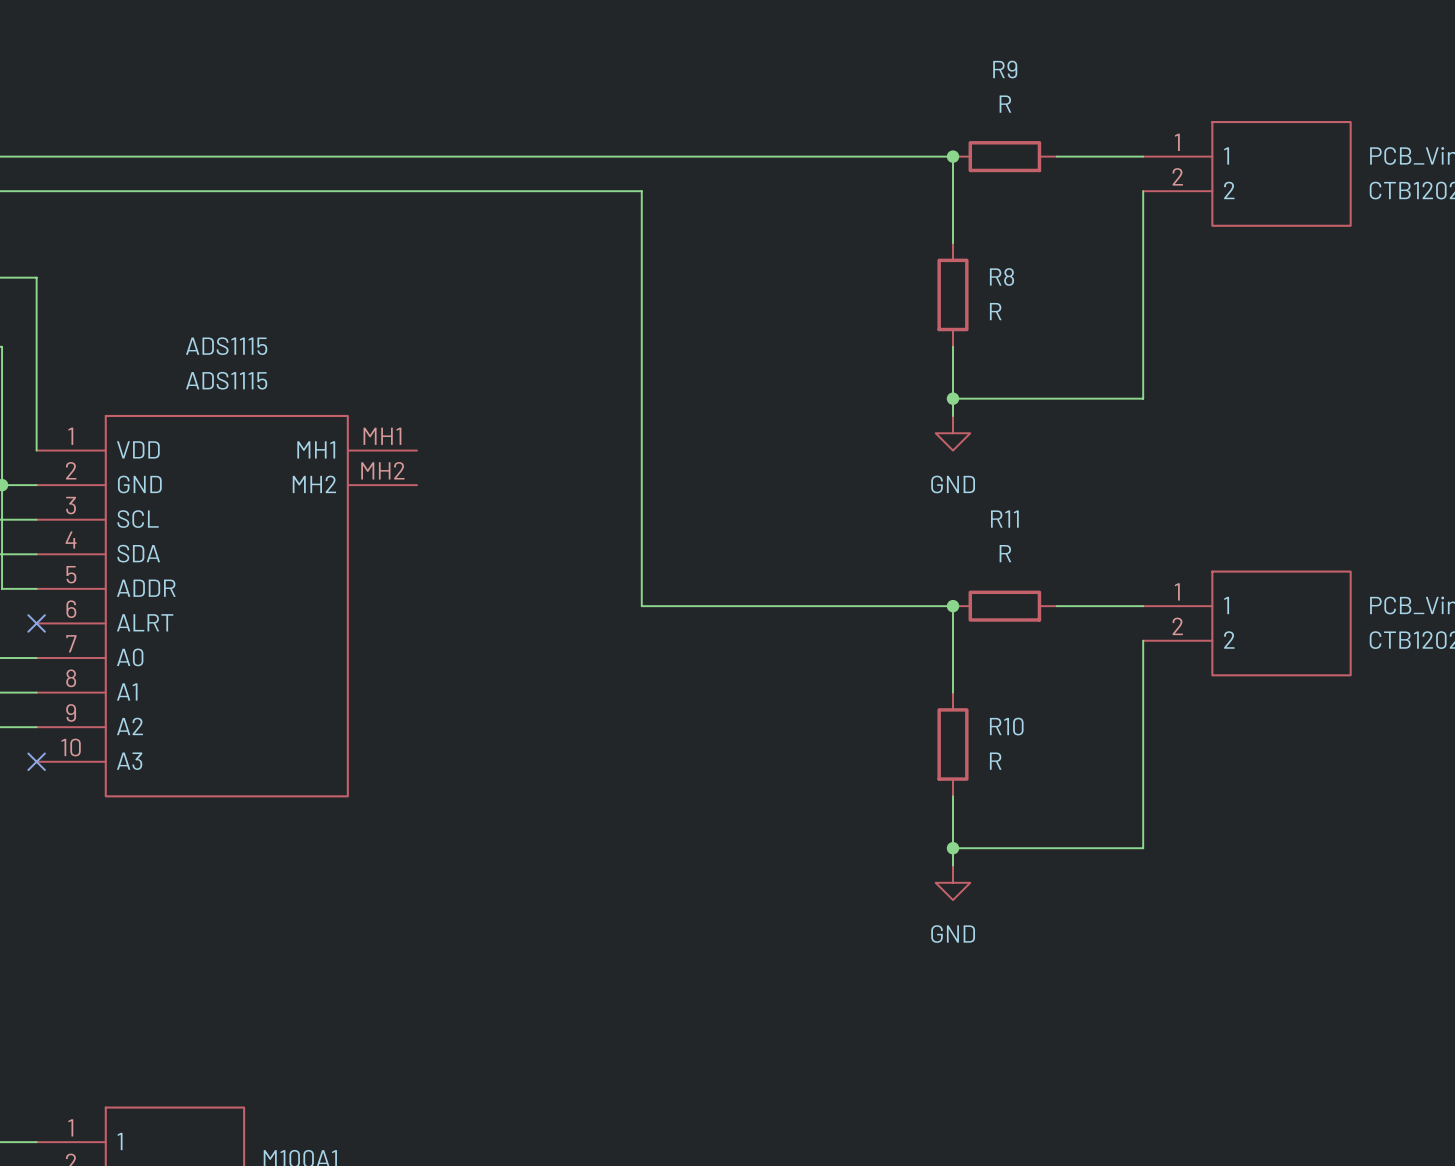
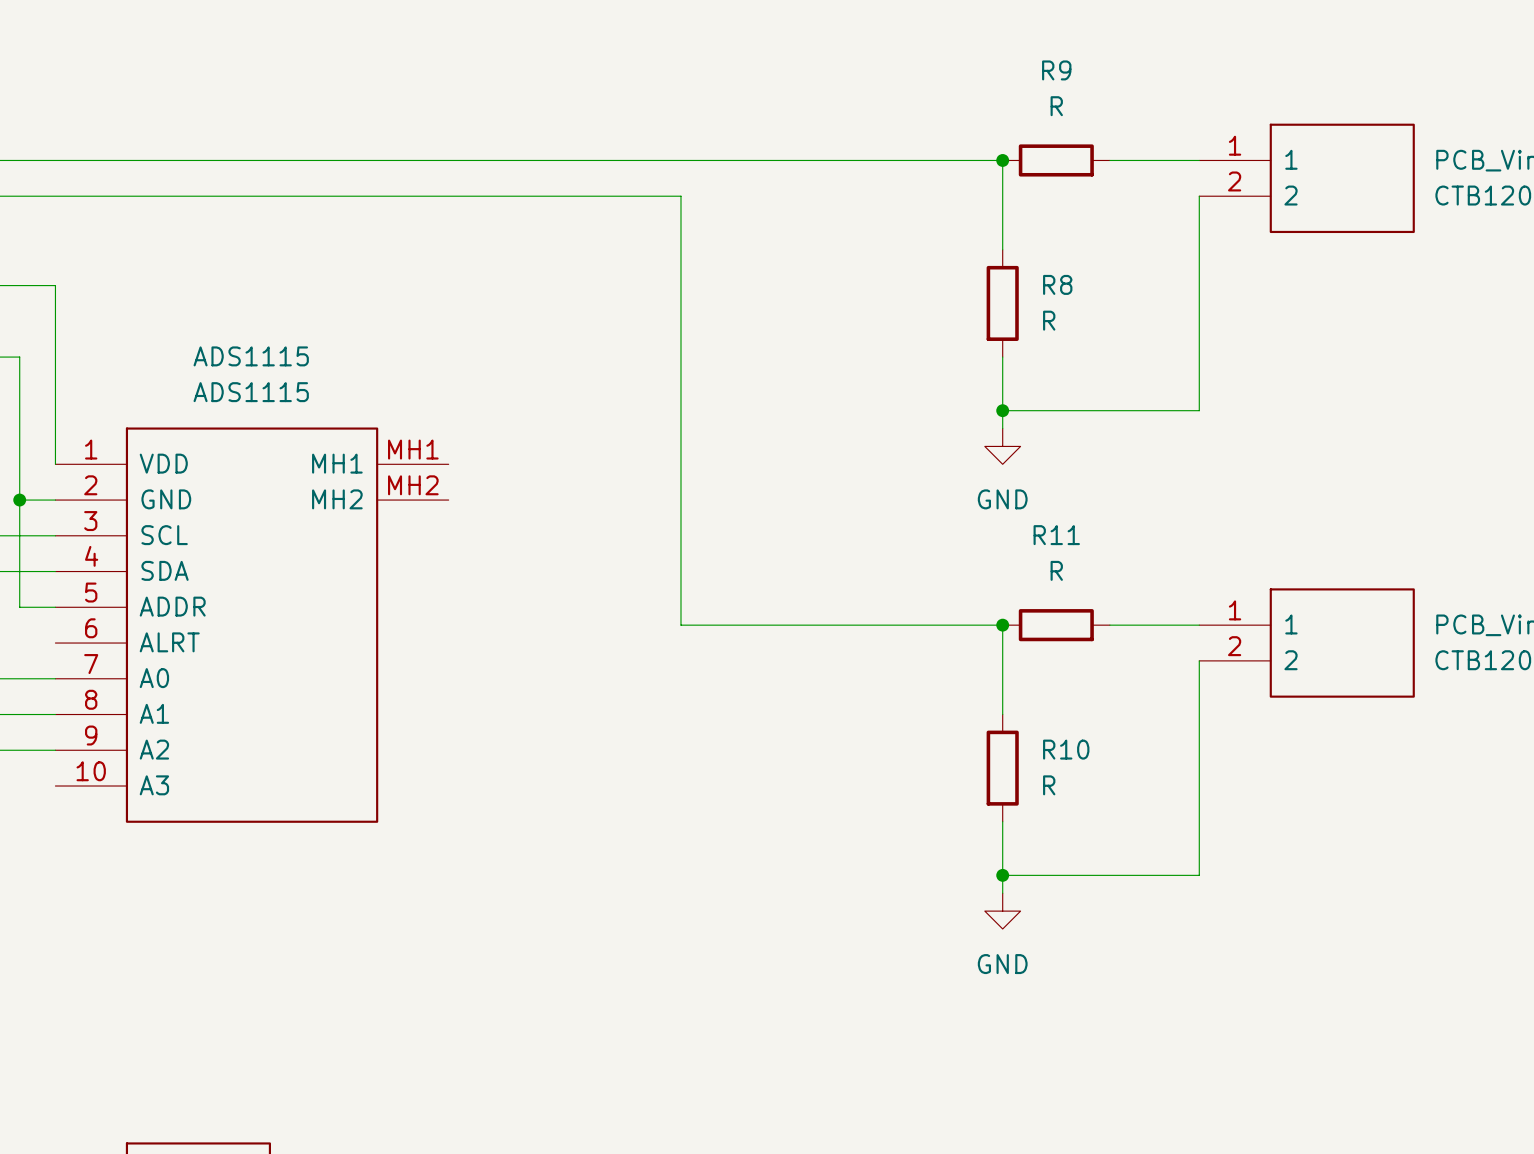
no-connect mark: (36, 623) -> none
no-connect mark: (36, 761) -> none

